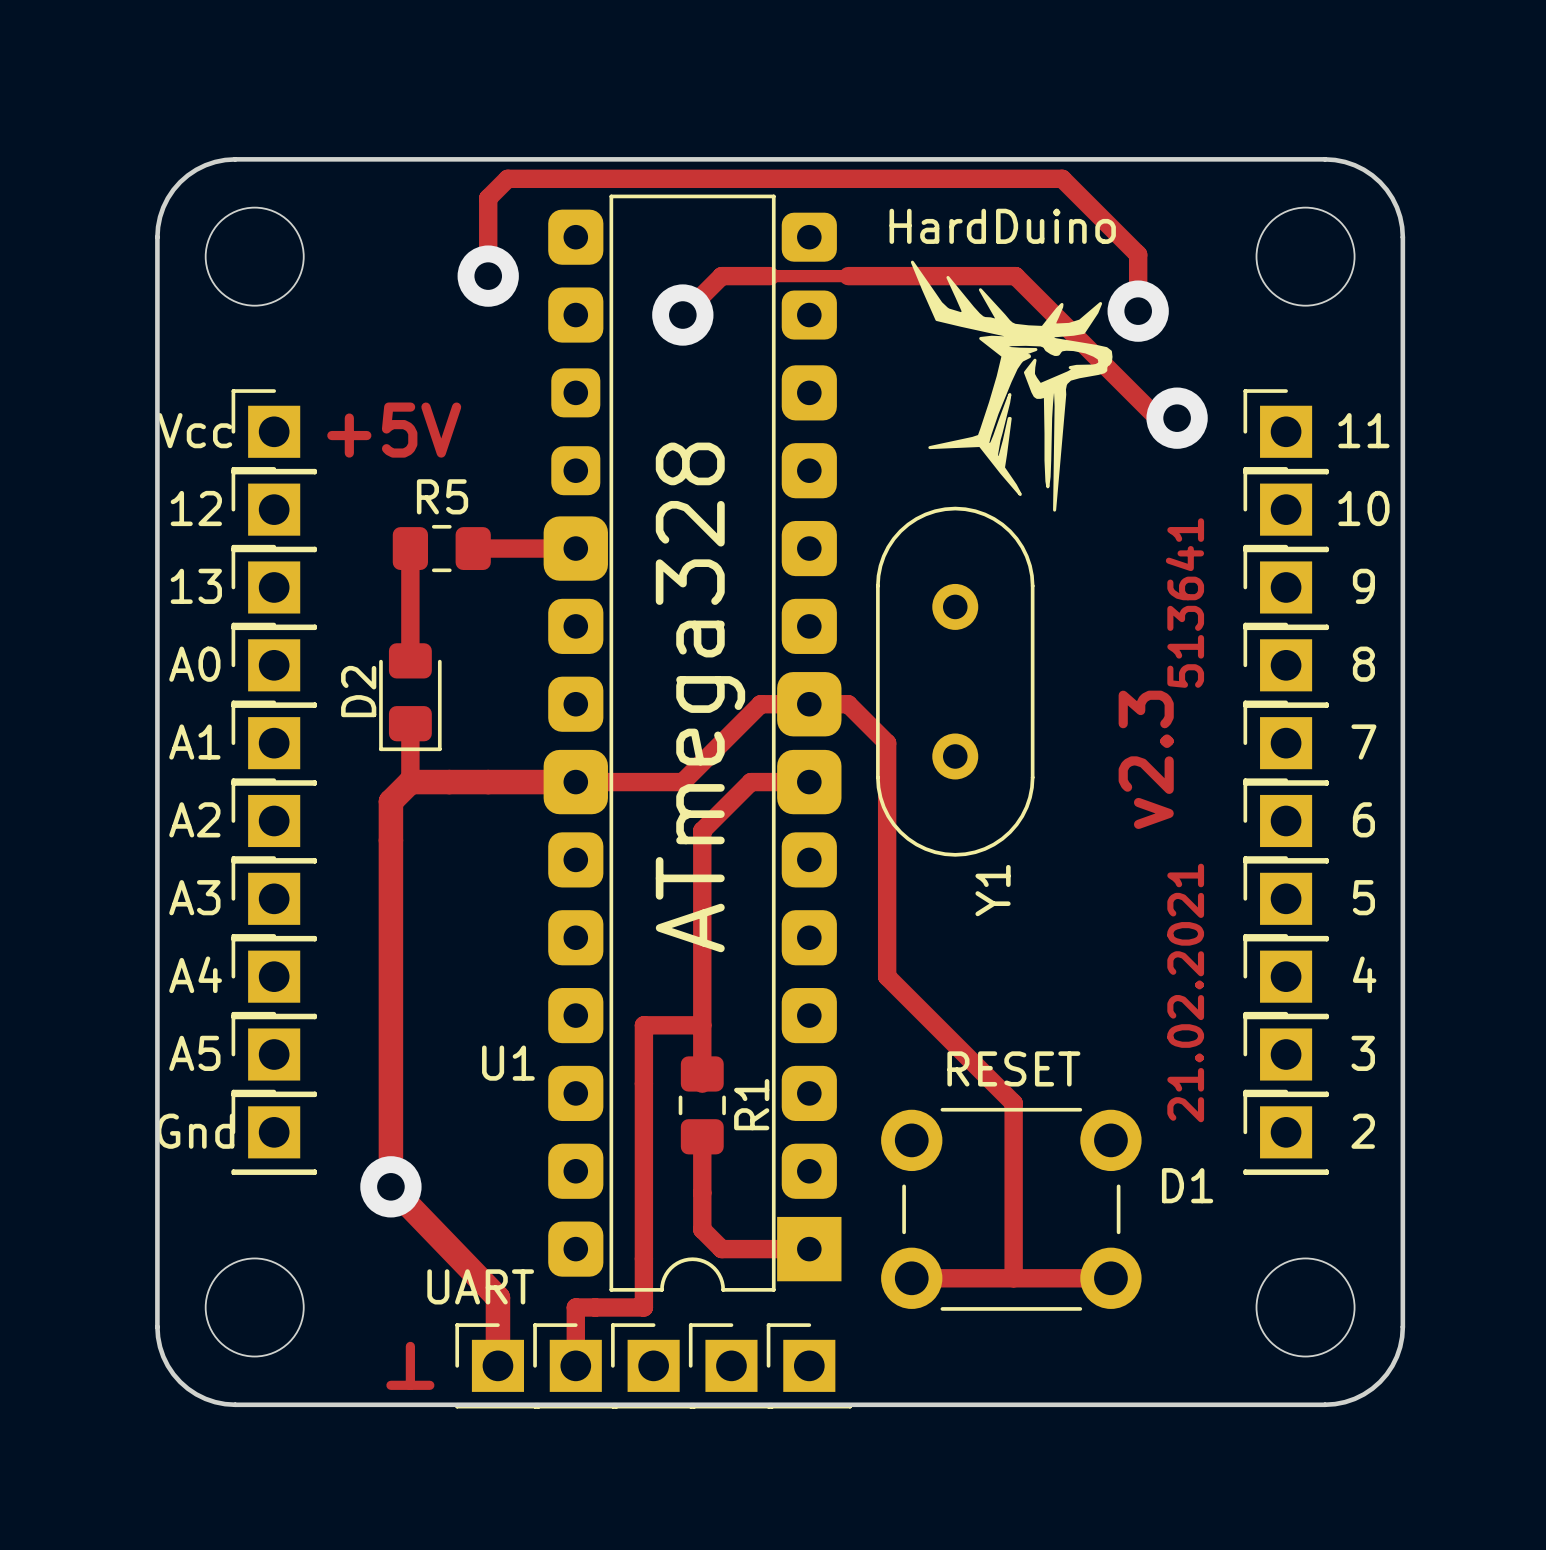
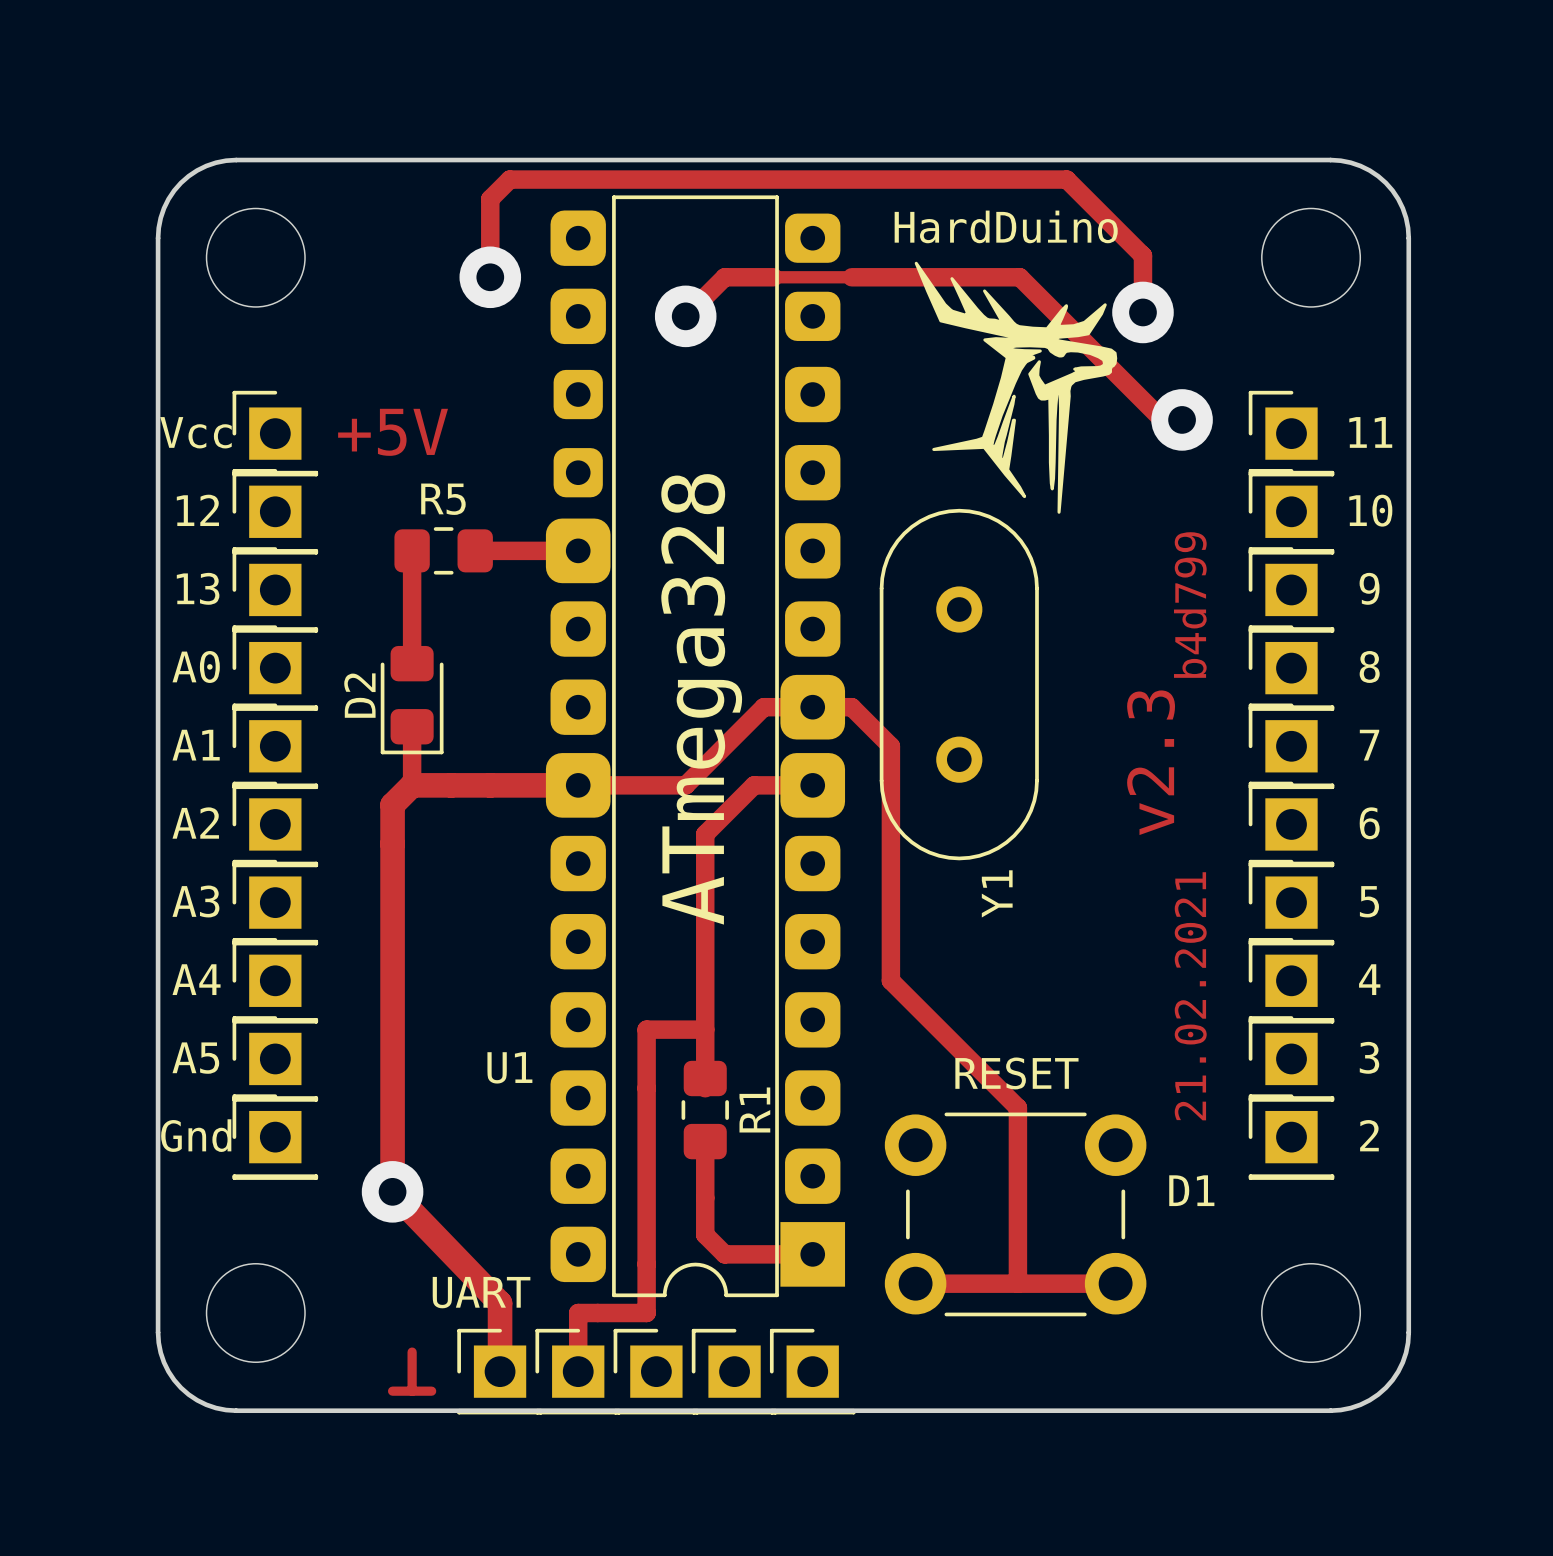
text: 513641 (1184, 603) -> b4d799 (1190, 605)

